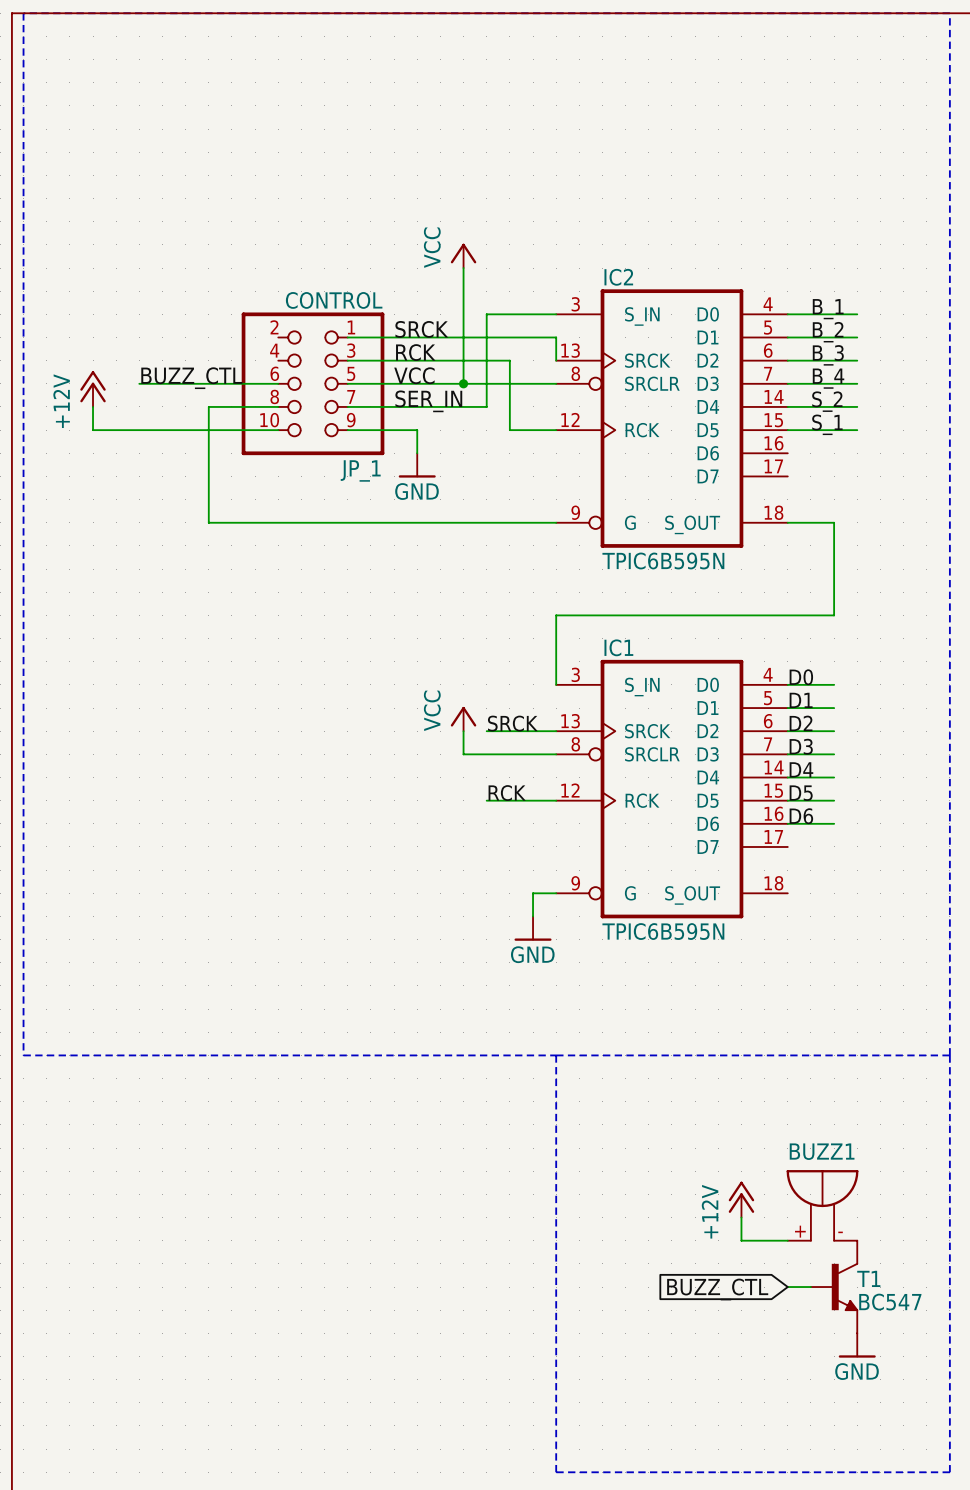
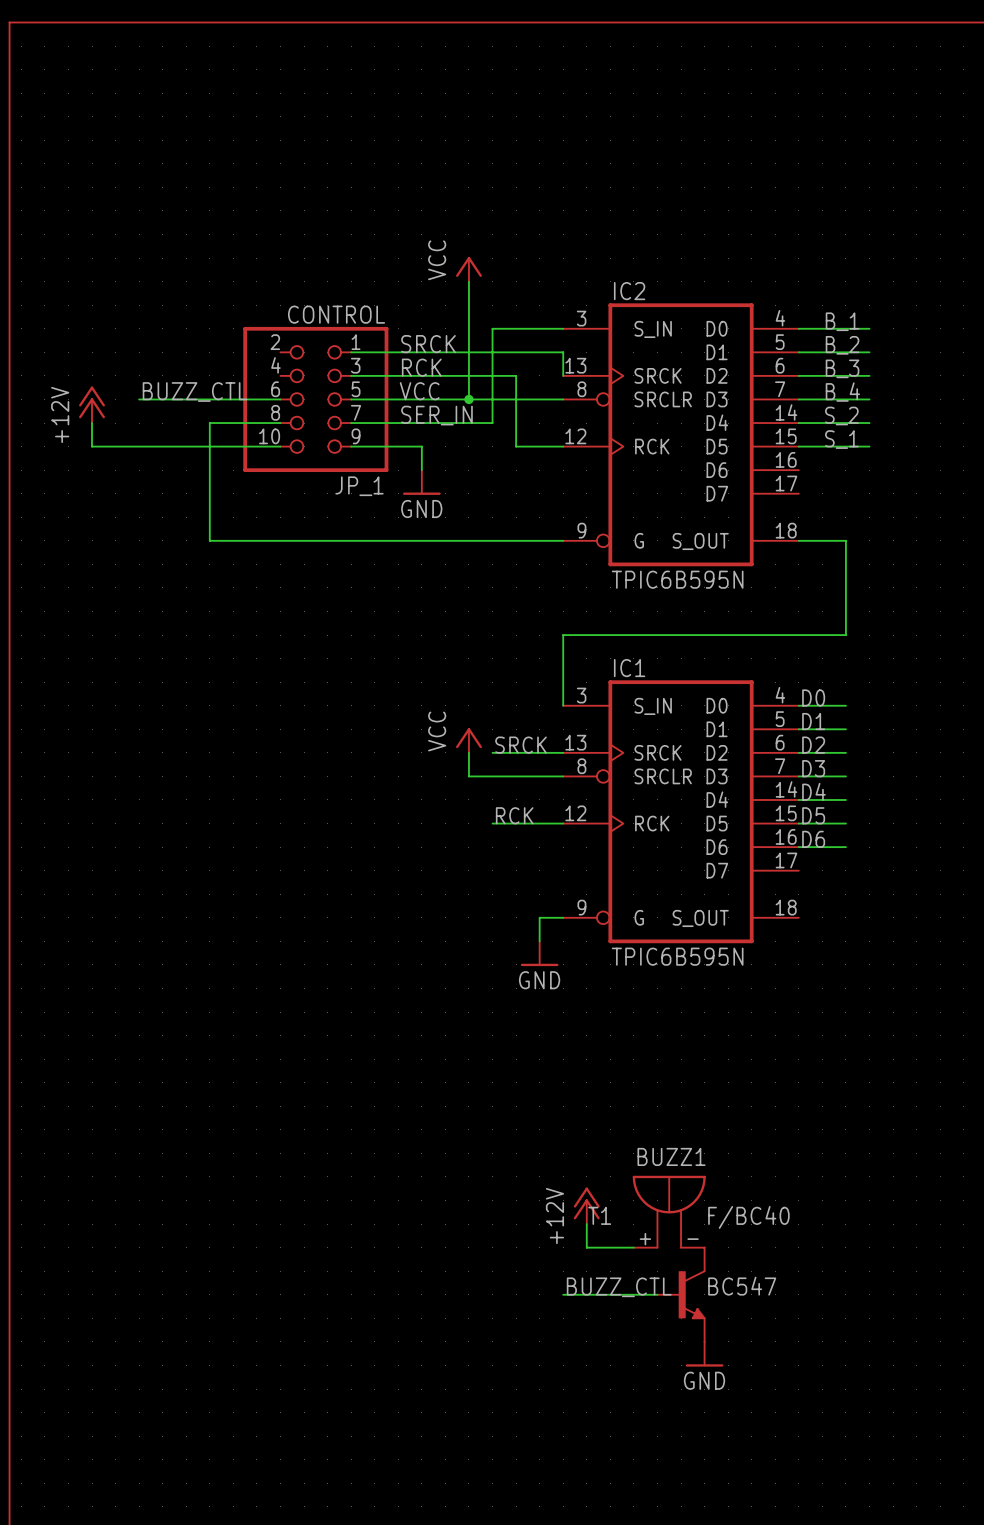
line: (556, 1055) (556, 1472) (949, 1472) (949, 13) (23, 13) (23, 1055) (949, 1055) -> none
BUZZ1 value: none -> F/BC40 (748, 1217)
power symbol position: +12V (741, 1199) -> +12V (586, 1205)
BUZZ1 position: (822, 1205) -> (669, 1212)
wire: (741, 1217) (741, 1240) (787, 1240) -> (586, 1224) (586, 1247) (633, 1247)
label: none -> BUZZ_CTL (619, 1287)
wire: none -> (563, 1294) (657, 1294)
T1 name position: T1 (868, 1278) -> T1 (599, 1215)
wire: (787, 1287) (810, 1287) -> none
T1 position: (834, 1287) -> (681, 1294)
global label: BUZZ_CTL (717, 1289) -> none
T1 value position: BC547 (890, 1302) -> BC547 (742, 1286)
power symbol position: GND (857, 1345) -> GND (704, 1354)

